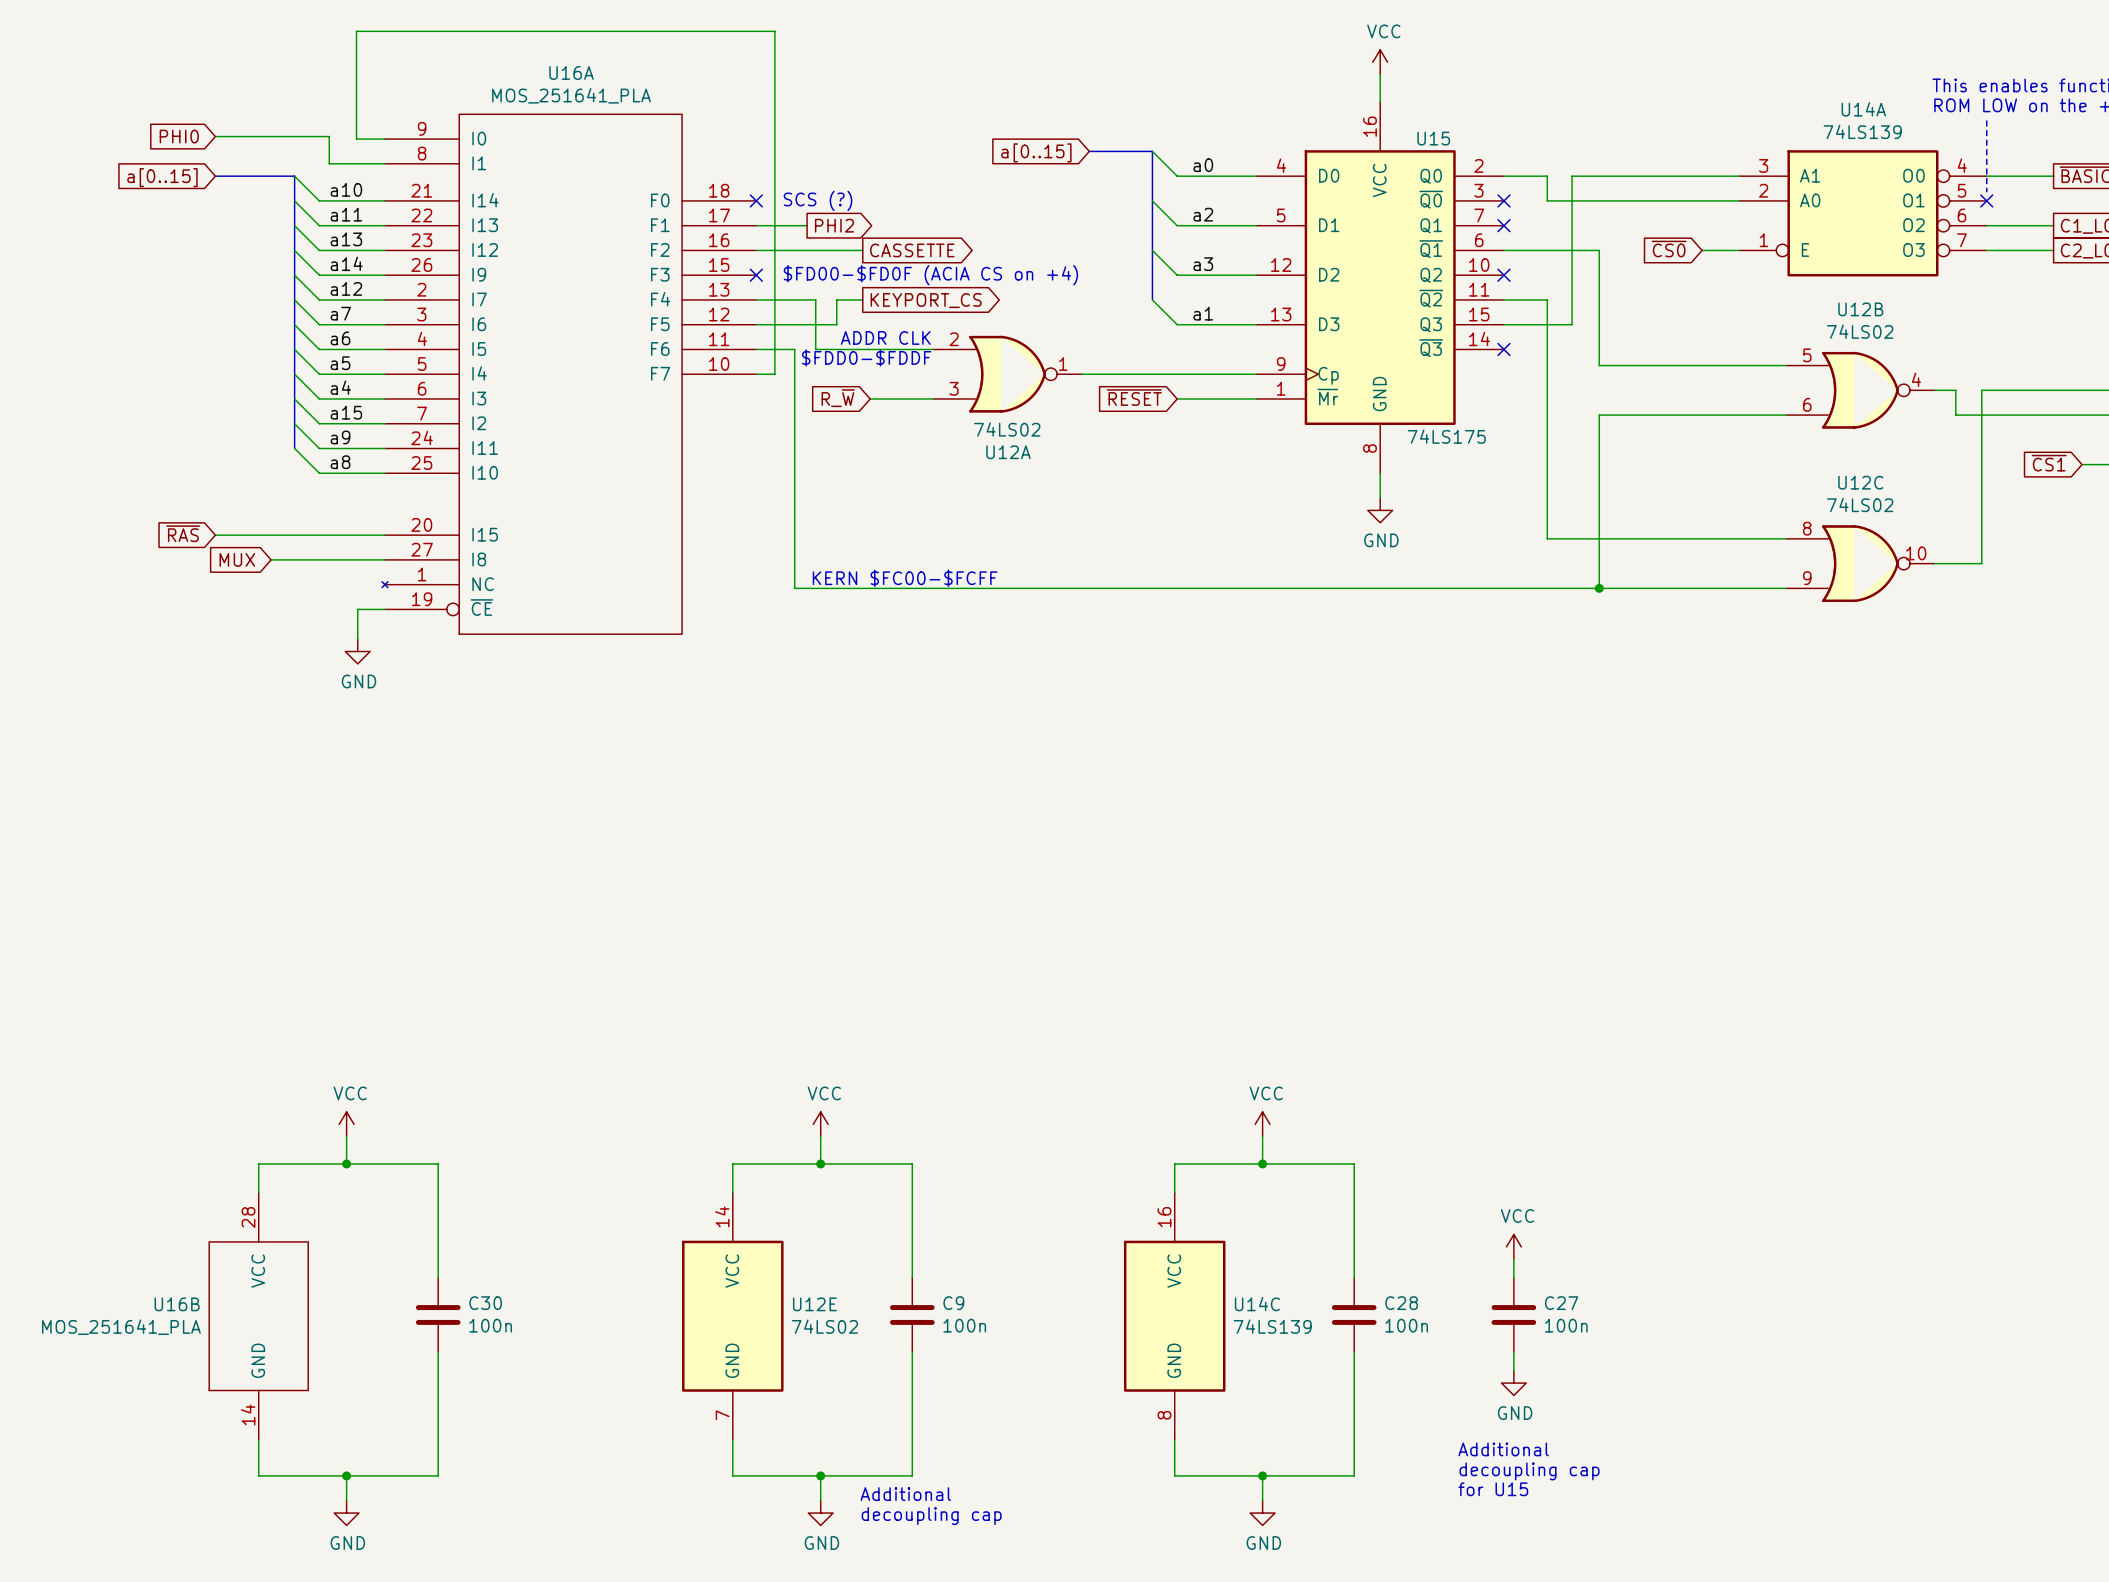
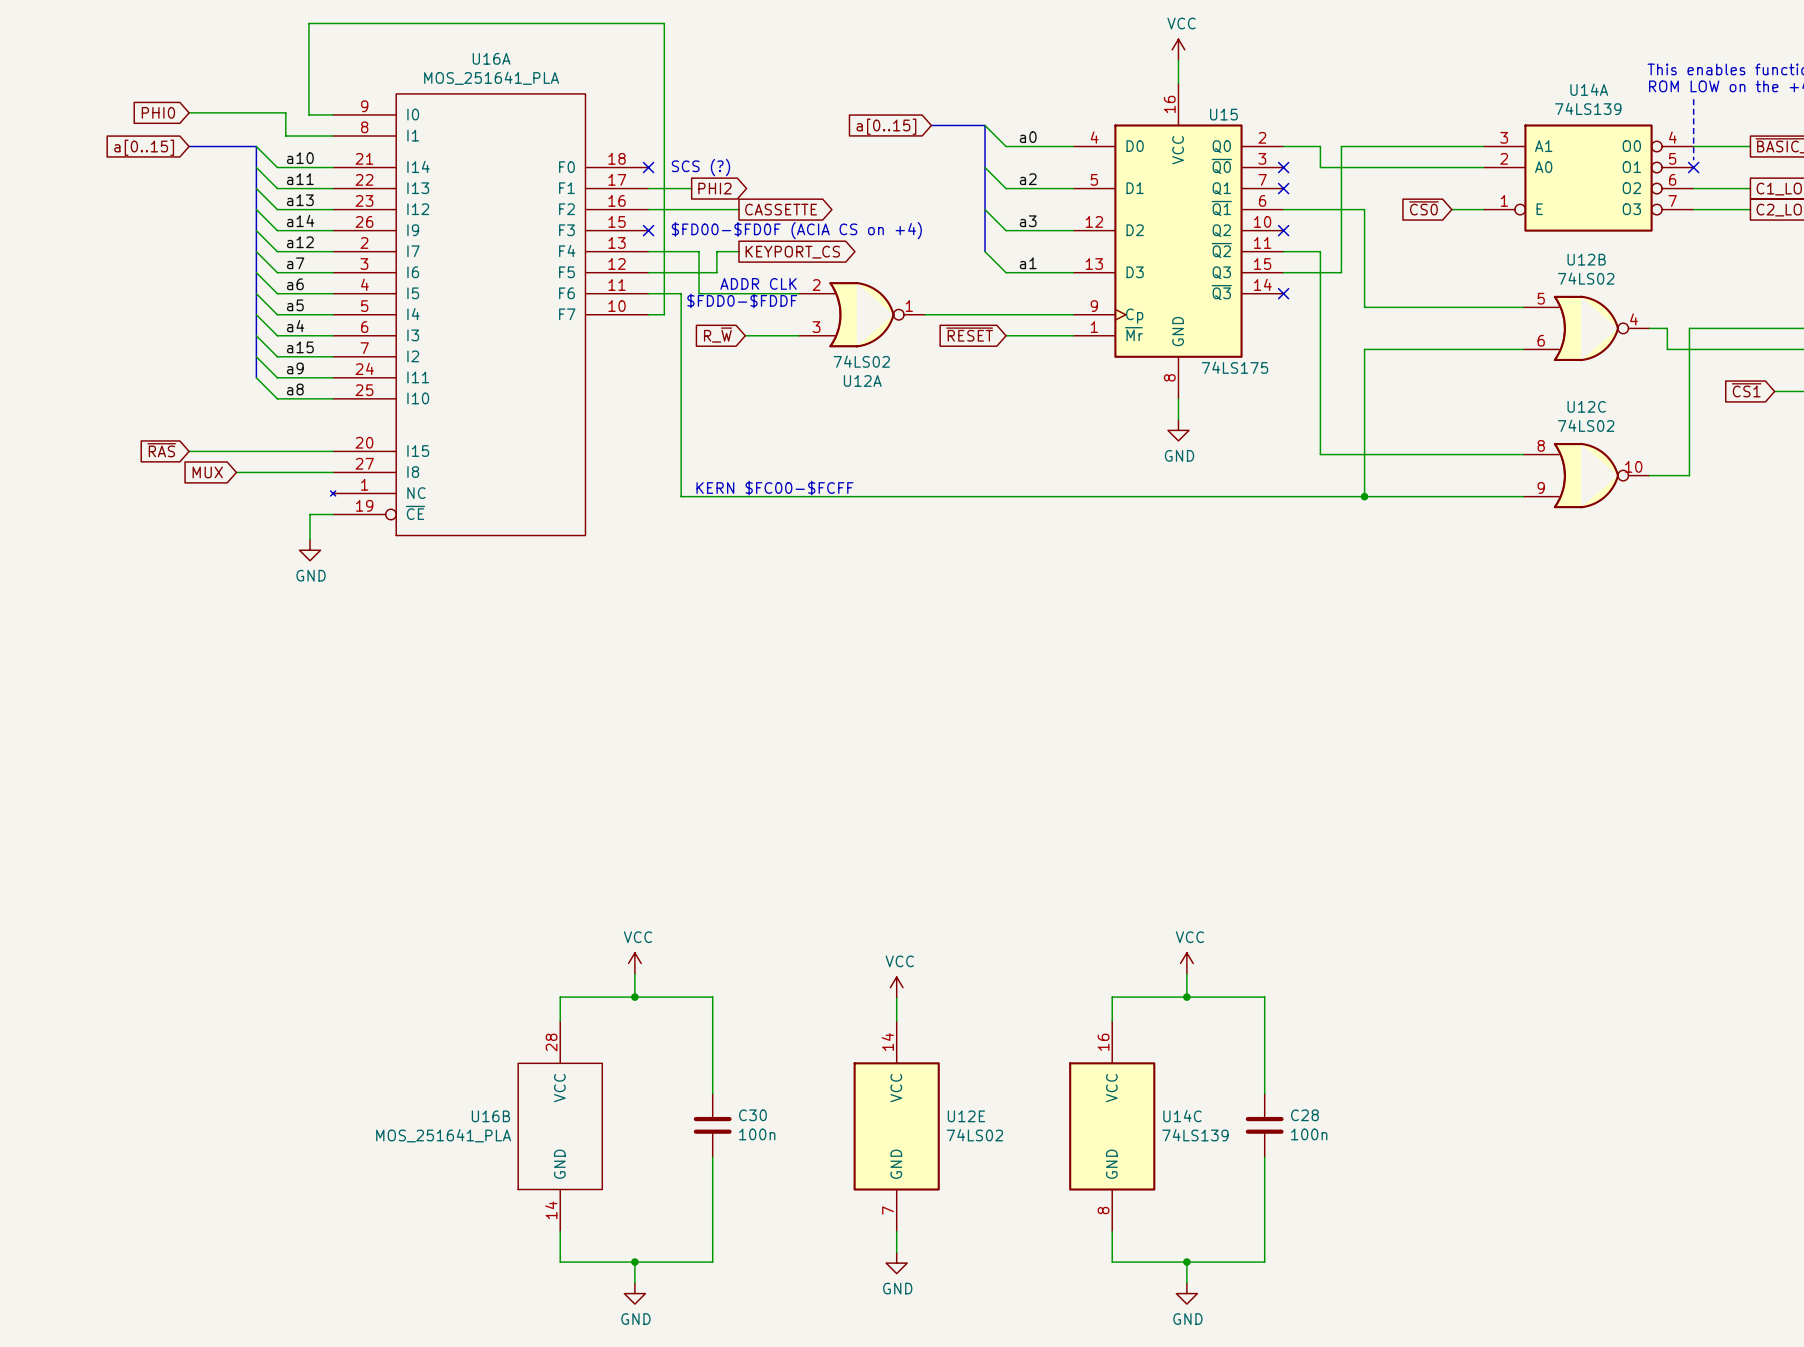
power symbol: VCC (346, 1124) -> none
power symbol position: VCC (820, 1124) -> VCC (634, 963)
power symbol: VCC (1262, 1124) -> none
wire: (346, 1136) (346, 1163) -> none
wire: (820, 1136) (820, 1163) -> (634, 973) (634, 997)
wire: (1262, 1136) (1262, 1163) -> (1186, 973) (1186, 997)
power symbol: none -> VCC (1186, 963)
junction: (346, 1163) -> none
junction: (820, 1163) -> none
junction: (1262, 1163) -> none
power symbol: none -> VCC (896, 987)
junction: none -> (634, 997)
junction: none -> (1186, 997)
wire: none -> (896, 998) (896, 1021)
wire: (258, 1192) (258, 1163) (438, 1163) (438, 1277) -> none
wire: (732, 1192) (732, 1163) (912, 1163) (912, 1277) -> (560, 1021) (560, 997) (712, 997) (712, 1093)
wire: (1174, 1192) (1174, 1163) (1354, 1163) (1354, 1277) -> (1112, 1021) (1112, 997) (1264, 997) (1264, 1093)
power symbol: VCC (1513, 1246) -> none
wire: (1513, 1259) (1513, 1277) -> none
C30 position: (438, 1314) -> (712, 1125)
C9: 100n (912, 1314) -> none
C28 position: (1354, 1314) -> (1264, 1125)
C27: 100n (1513, 1314) -> none
U16B position: (258, 1316) -> (560, 1126)
U12E position: (732, 1316) -> (896, 1126)
U14C position: (1174, 1316) -> (1112, 1126)
wire: (438, 1352) (438, 1475) (258, 1475) (258, 1440) -> none
wire: (912, 1352) (912, 1475) (732, 1475) (732, 1440) -> (712, 1156) (712, 1262) (560, 1262) (560, 1231)
wire: (1354, 1352) (1354, 1475) (1174, 1475) (1174, 1440) -> (1264, 1156) (1264, 1262) (1112, 1262) (1112, 1231)
wire: (1513, 1352) (1513, 1370) -> none
power symbol: GND (1513, 1383) -> none
text: Additional (1503, 1449) -> none
wire: none -> (896, 1231) (896, 1252)
text: decoupling cap (1529, 1471) -> none
wire: (346, 1475) (346, 1500) -> none
junction: (346, 1475) -> none
wire: (820, 1475) (820, 1500) -> (634, 1262) (634, 1283)
junction: (820, 1475) -> none
wire: (1262, 1475) (1262, 1500) -> (1186, 1262) (1186, 1283)
junction: (1262, 1475) -> none
junction: none -> (634, 1262)
junction: none -> (1186, 1262)
text: for U15 (1493, 1489) -> none
power symbol: none -> GND (896, 1263)
text: Additional (905, 1494) -> none
power symbol: GND (346, 1513) -> none
power symbol position: GND (820, 1513) -> GND (634, 1293)
power symbol: GND (1262, 1513) -> none
text: decoupling cap (931, 1516) -> none
power symbol: none -> GND (1186, 1293)

